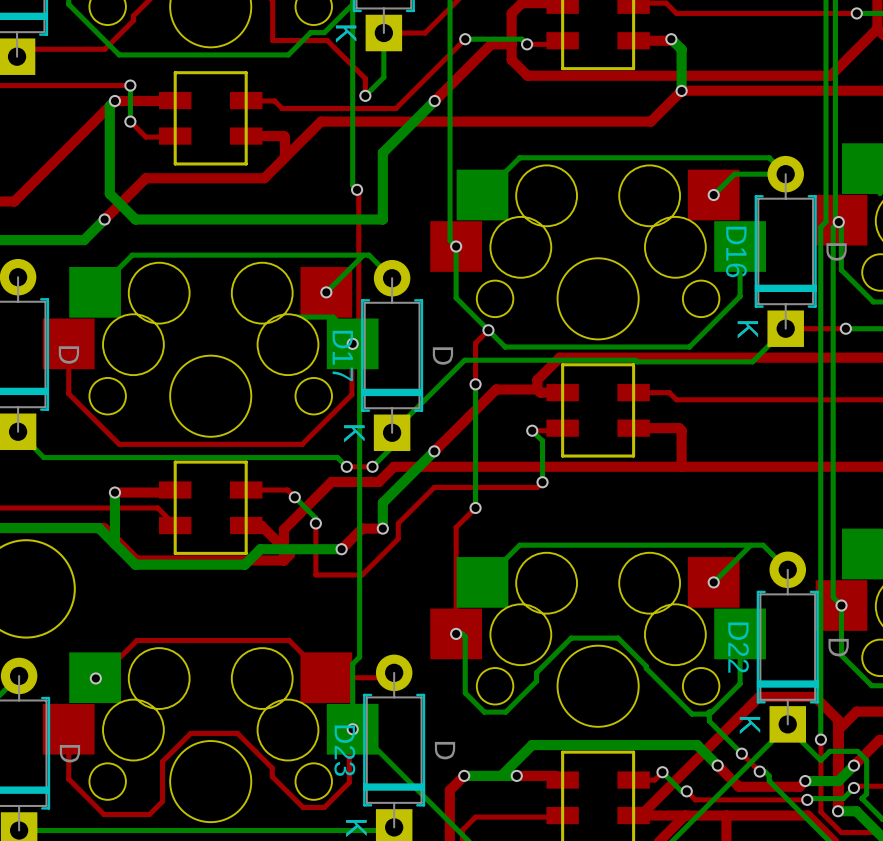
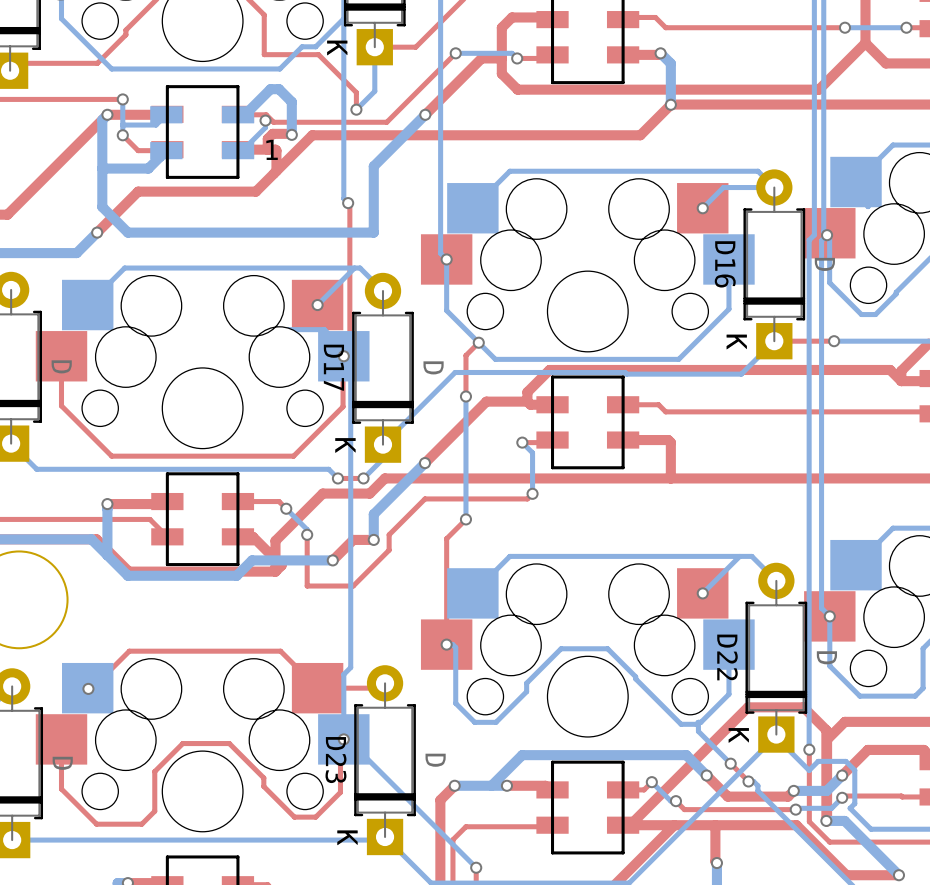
bottom track: none -> (162, 114) (162, 118) (156, 125) (122, 125)
part: none -> (166, 114)
part: none -> (238, 114)
bottom track: none -> (244, 114) (270, 89) (279, 89) (291, 101) (291, 134)
bottom track: none -> (265, 120) (265, 127) (242, 150)
via: none -> (265, 120)
top track: none -> (291, 134) (272, 133) (267, 138) (267, 149)
via: none -> (291, 134)
text: none -> 1 (272, 149)
bottom track: none -> (160, 150) (160, 156) (148, 168) (102, 168)
part: none -> (166, 150)
part: none -> (238, 150)

